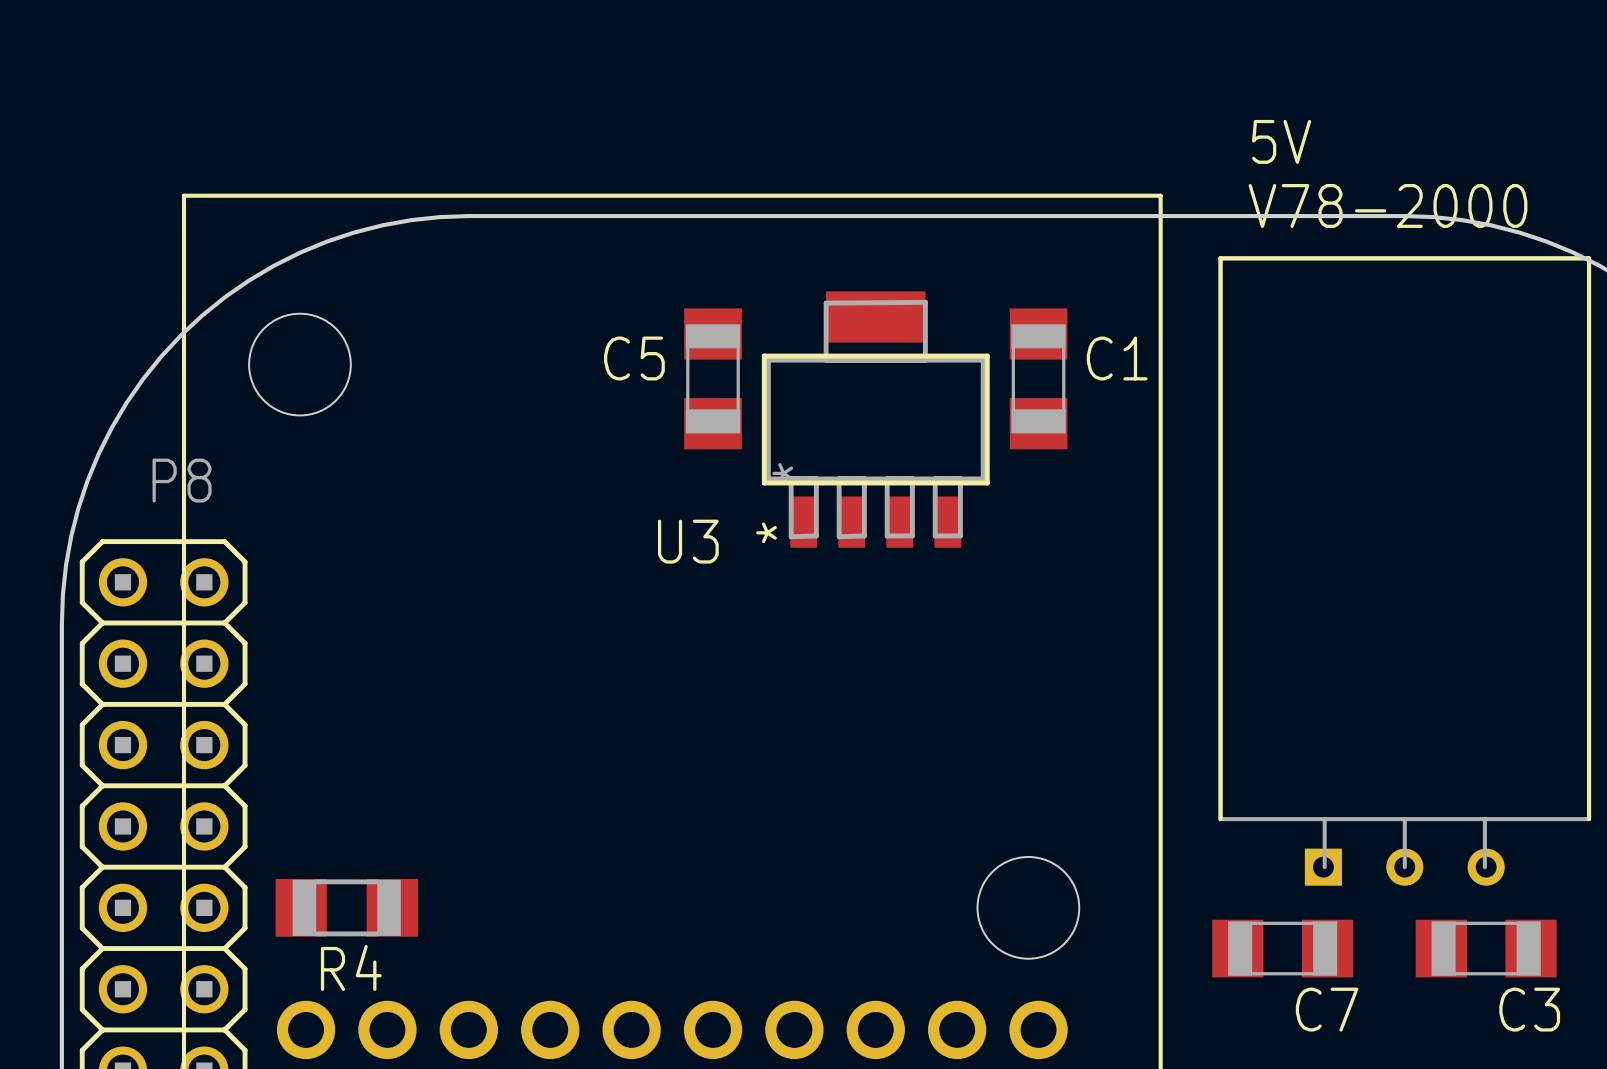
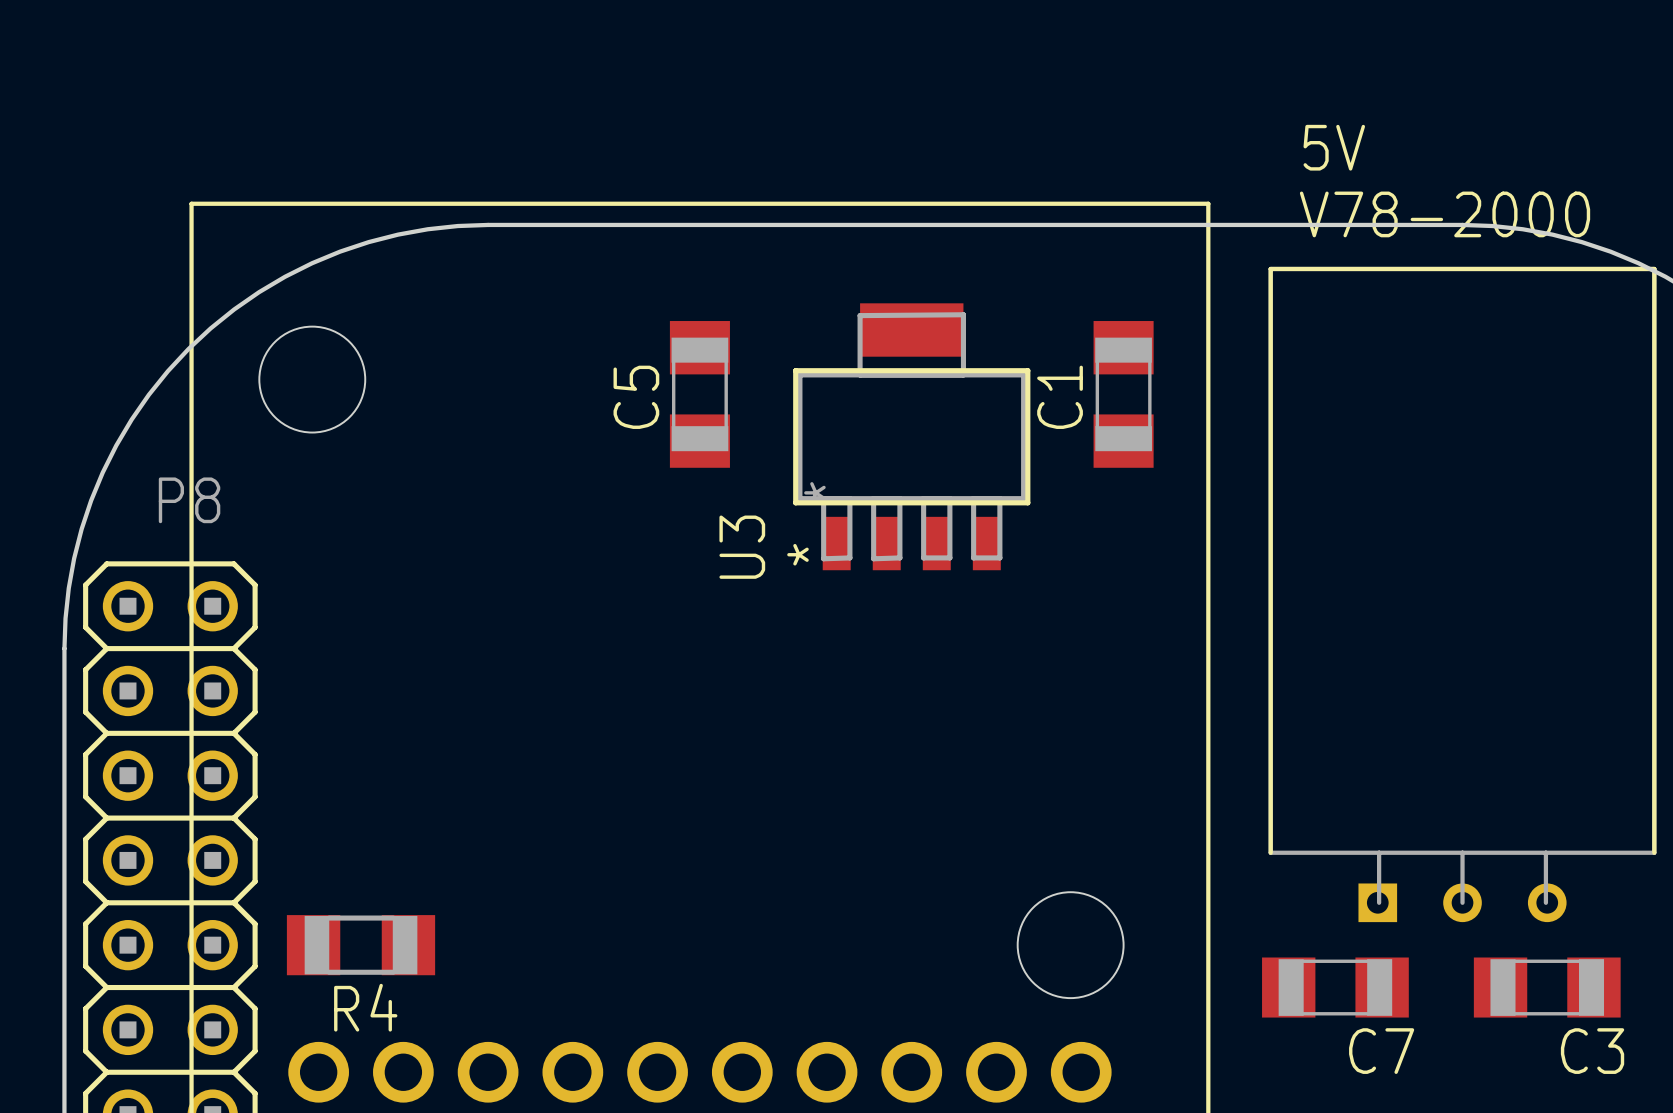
C5 name rotation: 0° (634, 358) -> 90° counterclockwise (636, 397)
C1 name rotation: 0° (1117, 358) -> 90° counterclockwise (1060, 397)
C1 name position: C1 (1117, 358) -> C1 (1060, 397)
C5 position: (713, 378) -> (699, 394)
C1 position: (1038, 378) -> (1123, 394)
U3 name rotation: 0° (688, 541) -> 90° counterclockwise (742, 547)

